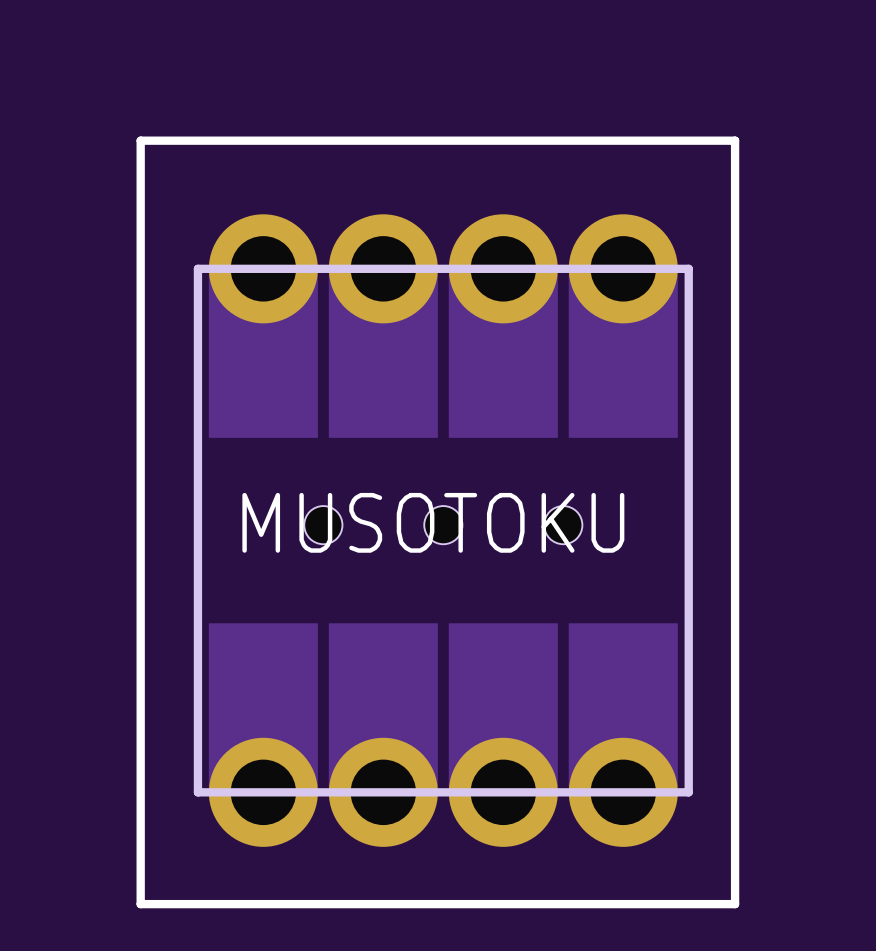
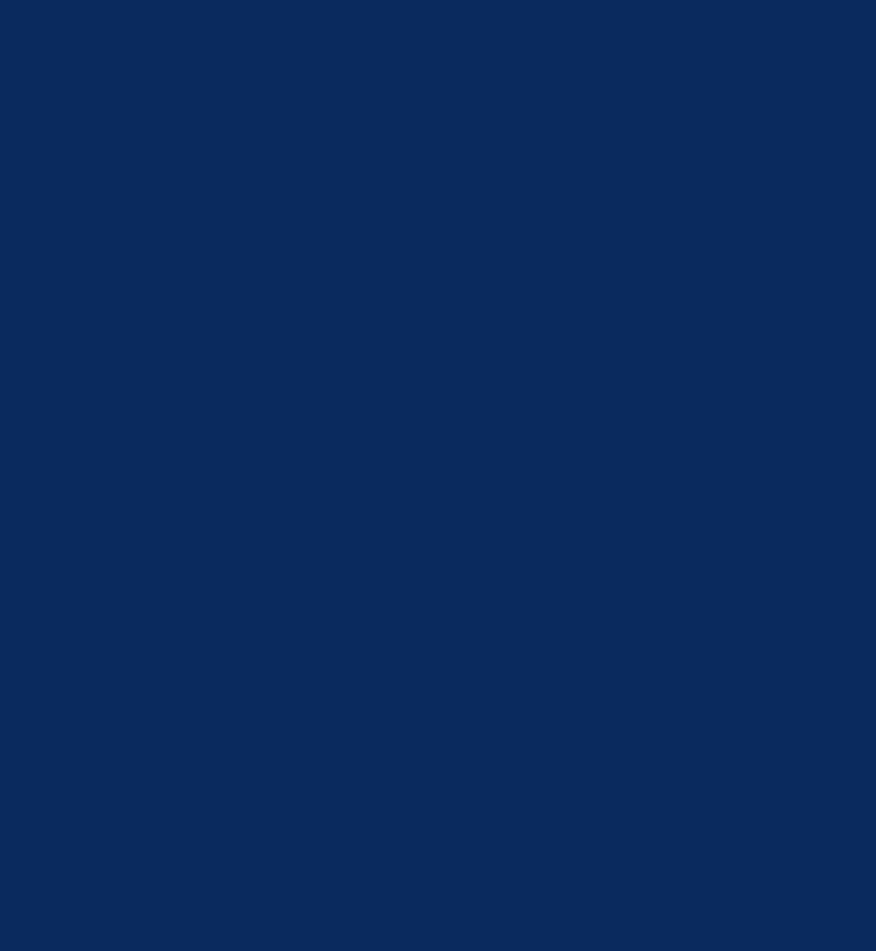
line: (140, 140) (140, 904) (735, 904) (735, 140) (140, 140) -> none
board edge: (197, 268) (688, 268) (688, 792) (197, 792) (197, 268) -> none
via: (263, 268) -> none
via: (383, 268) -> none
via: (503, 268) -> none
via: (623, 268) -> none
drawing: [208, 274, 678, 438] -> none
text: MUSOTOKU (433, 522) -> none
hole: (323, 525) -> none
hole: (443, 525) -> none
hole: (563, 525) -> none
drawing: [208, 623, 678, 787] -> none
via: (263, 792) -> none
via: (383, 792) -> none
via: (503, 792) -> none
via: (623, 792) -> none

